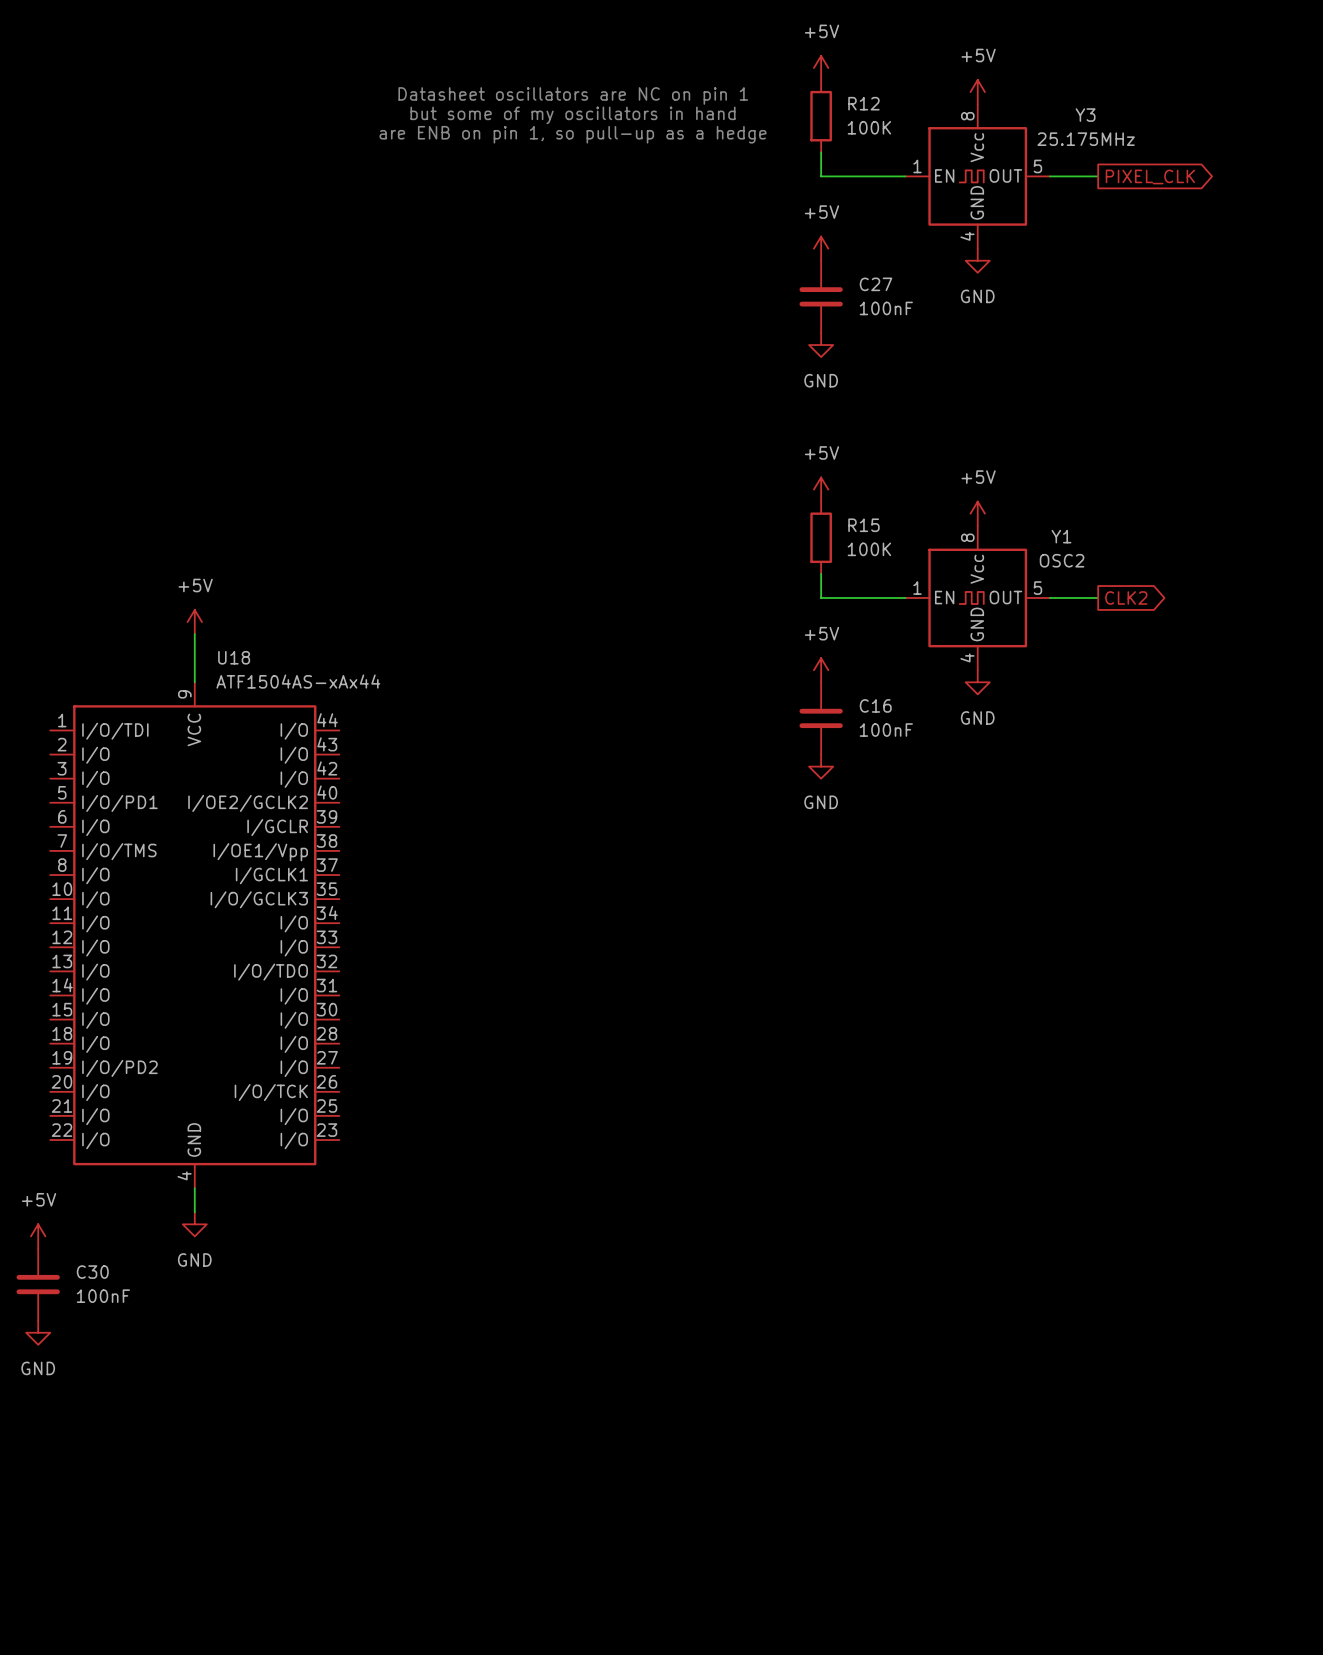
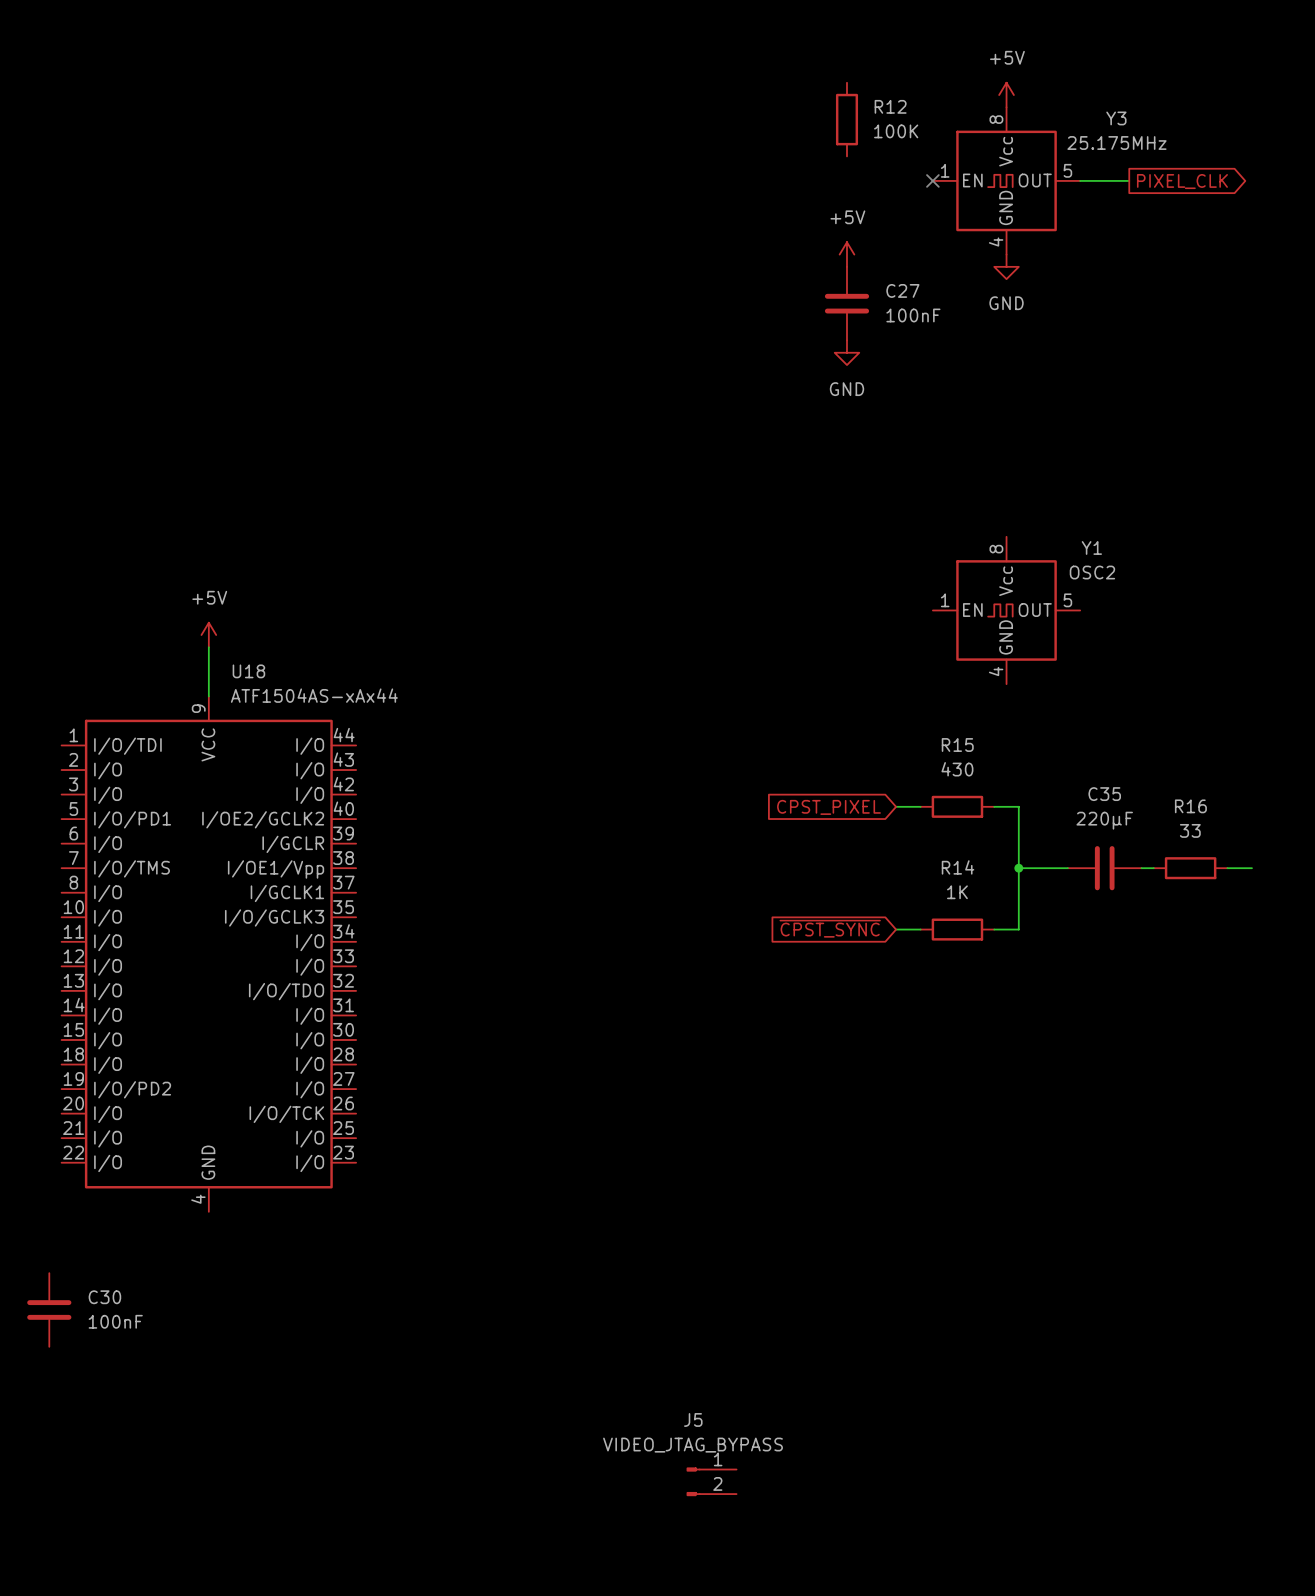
power symbol: +5V (821, 67) -> none
text: Datasheet oscillators are NC on pin 1 (573, 95) -> none
text: but some of my oscillators in hand (573, 115) -> none
text: are ENB on pin 1, so pull-up as a hedge (573, 134) -> none
wire: (821, 152) (821, 176) (905, 176) -> none
no-connect mark: none -> (932, 180)
power symbol: +5V (821, 489) -> none
power symbol: +5V (977, 513) -> none
R15 name position: R15 (863, 525) -> R15 (957, 745)
R15 rotation: 0° (821, 537) -> 90° clockwise (957, 806)
R15 position: (821, 537) -> (957, 806)
R15 value: 100K (869, 549) -> 430 (957, 769)
wire: (821, 573) (821, 597) (905, 597) -> none
wire: (1049, 597) (1098, 597) -> none
global label: CLK2 (1126, 597) -> none
power symbol: +5V (821, 670) -> none
power symbol: GND (977, 682) -> none
C16: 100nF (821, 718) -> none
power symbol: GND (821, 766) -> none
wire: none -> (896, 806) (920, 806)
wire: none -> (994, 806) (1018, 806) (1018, 929) (994, 929)
global label: none -> CPST_PIXEL (829, 807)
wire: none -> (1018, 868) (1067, 868)
junction: none -> (1018, 868)
C35: none -> 220µF (1104, 868)
wire: none -> (1141, 868) (1153, 868)
R16: none -> 33 (1190, 868)
wire: none -> (1227, 868) (1251, 868)
global label: none -> ~{CPST_SYNC} (830, 928)
wire: none -> (896, 929) (920, 929)
R14: none -> 1K (957, 929)
wire: (194, 1188) (194, 1212) -> none
power symbol: GND (194, 1224) -> none
power symbol: +5V (38, 1236) -> none
power symbol: GND (38, 1332) -> none
J5: none -> VIDEO_JTAG_BYPASS (711, 1481)

